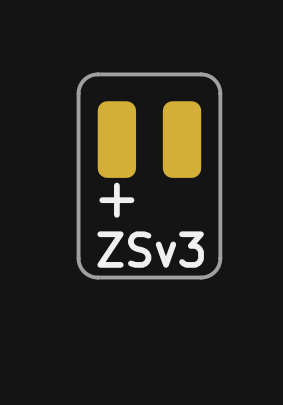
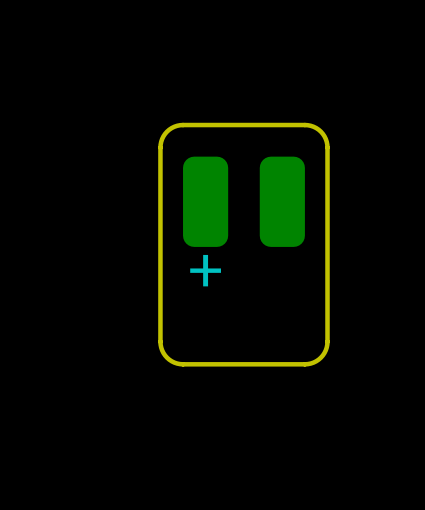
text: ZSv3 (150, 249) -> none

